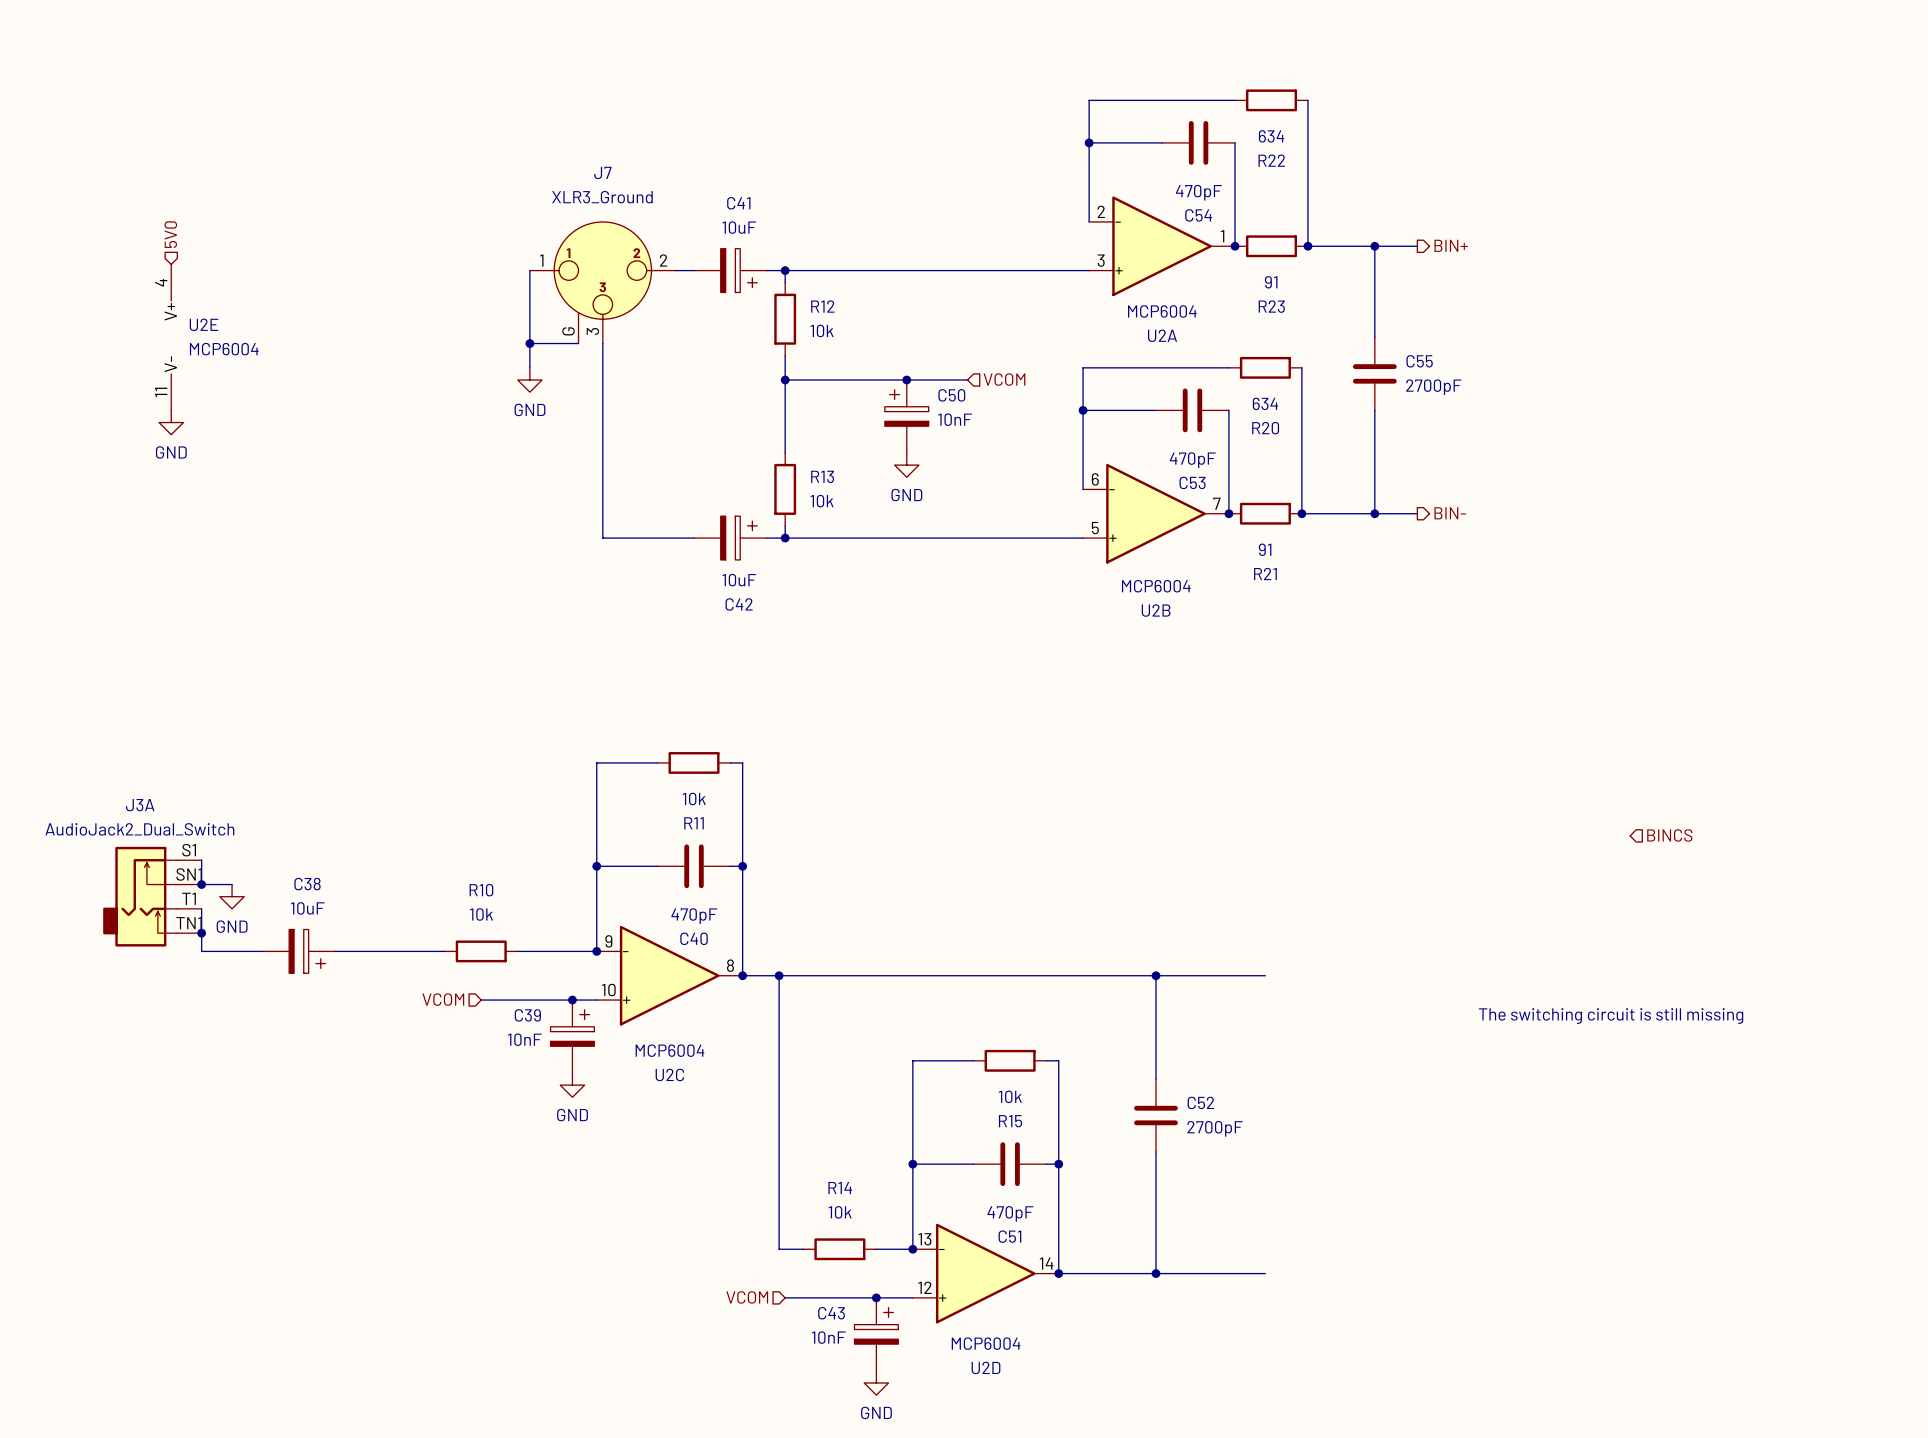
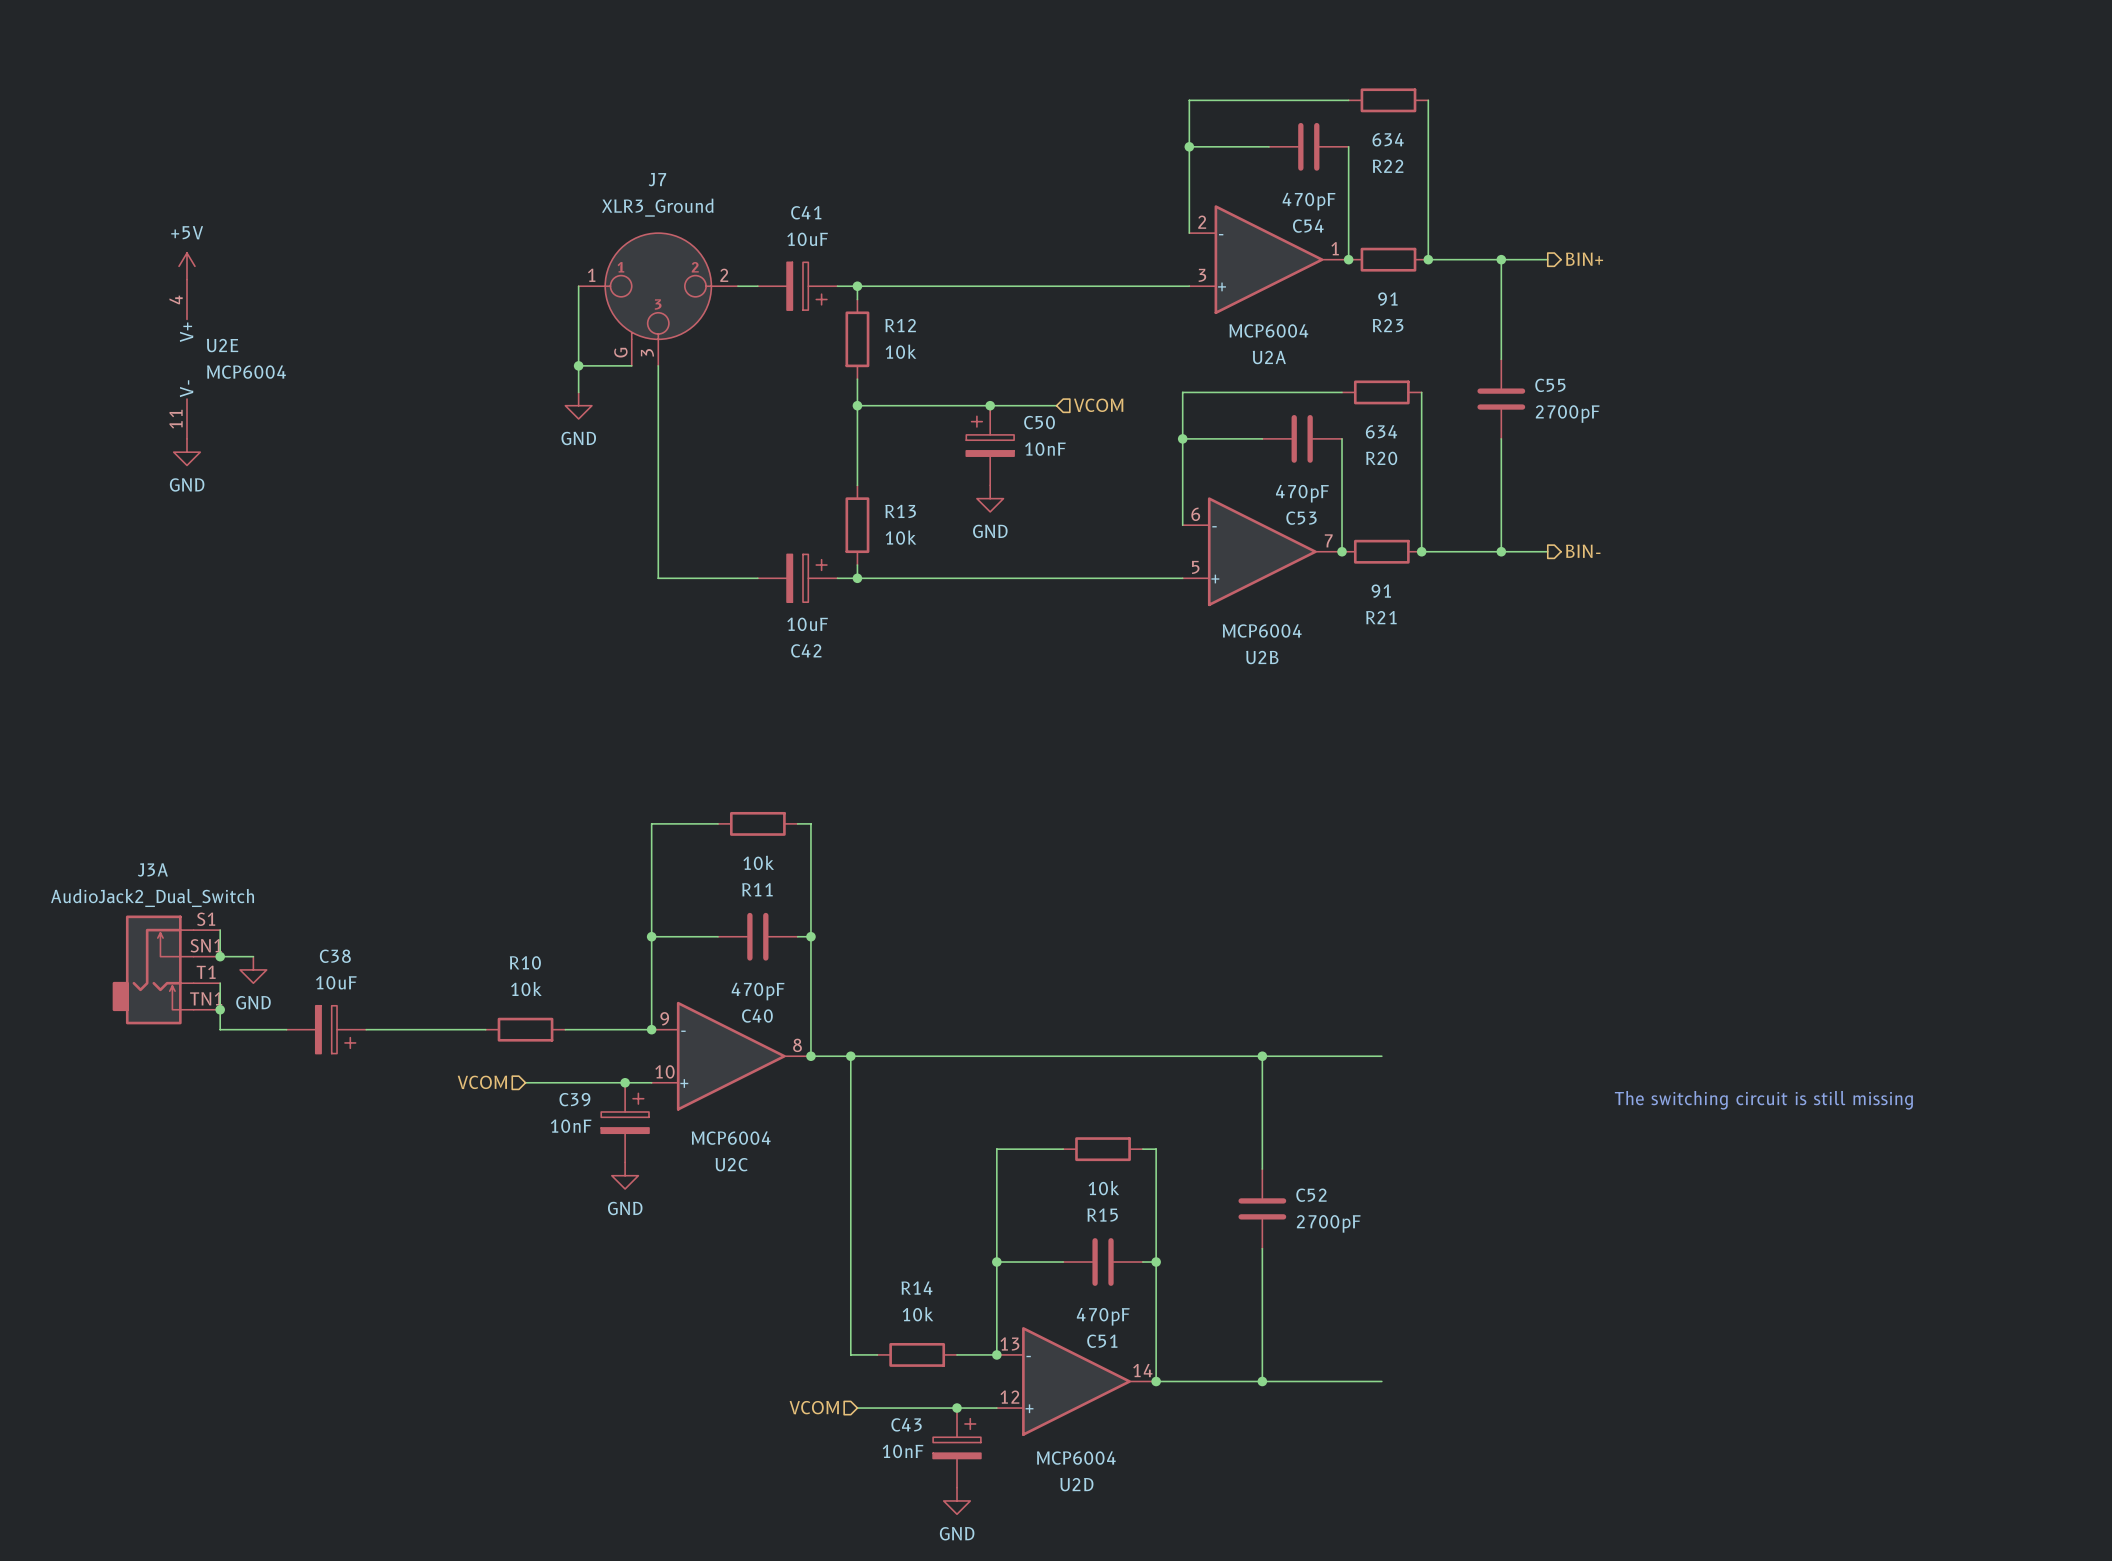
hierarchical label: 5V0 (170, 234) -> none
power symbol: none -> +5V (186, 266)
hierarchical label: BINCS (1669, 835) -> none

